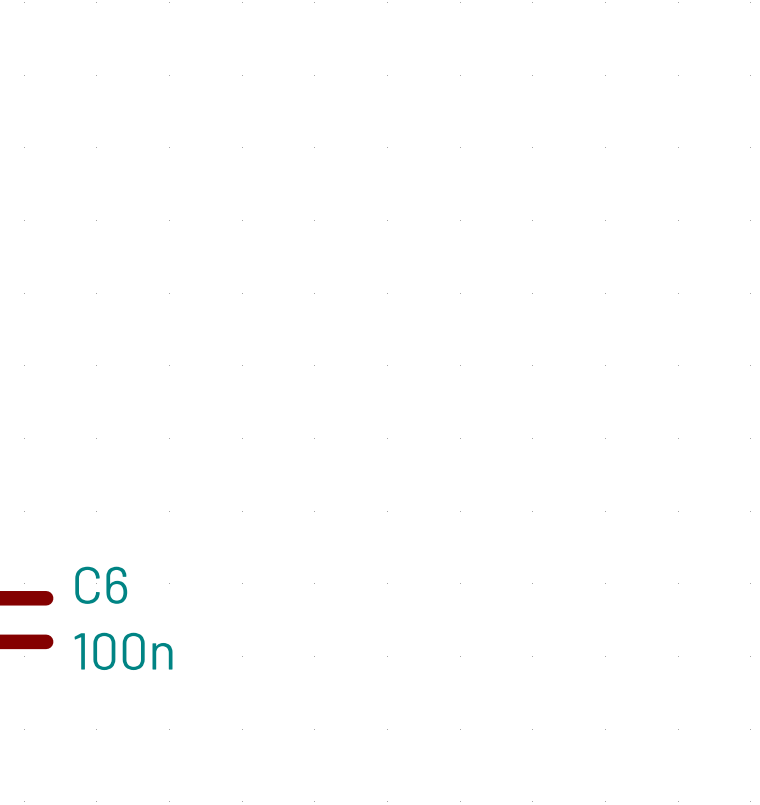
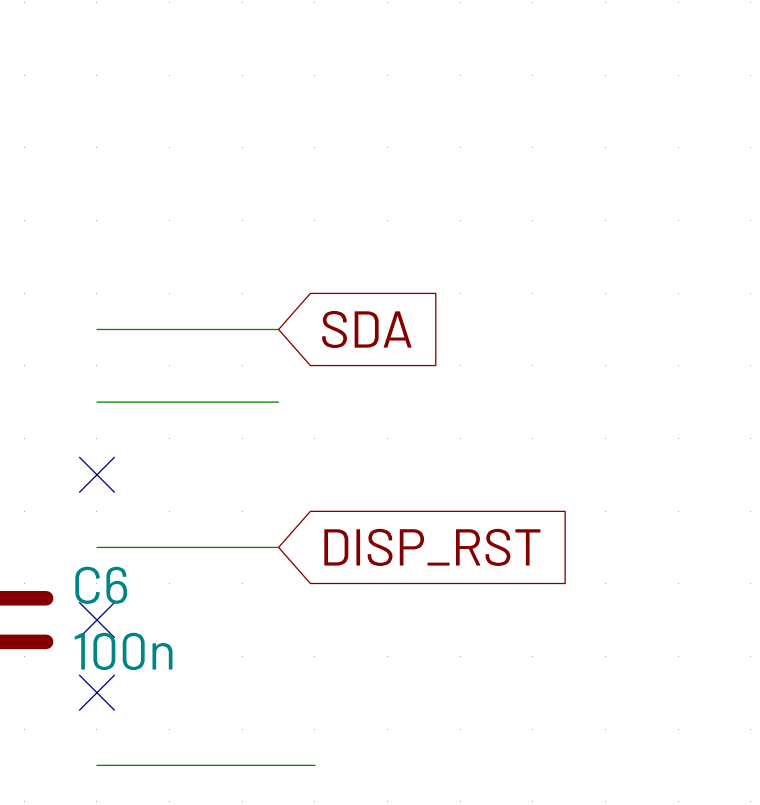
wire: none -> (96, 329) (278, 329)
global label: none -> SDA (366, 329)
wire: none -> (96, 402) (278, 402)
no-connect mark: none -> (96, 474)
wire: none -> (96, 547) (278, 547)
global label: none -> DISP_RST (432, 547)
no-connect mark: none -> (96, 620)
no-connect mark: none -> (96, 692)
wire: none -> (96, 765) (314, 765)

